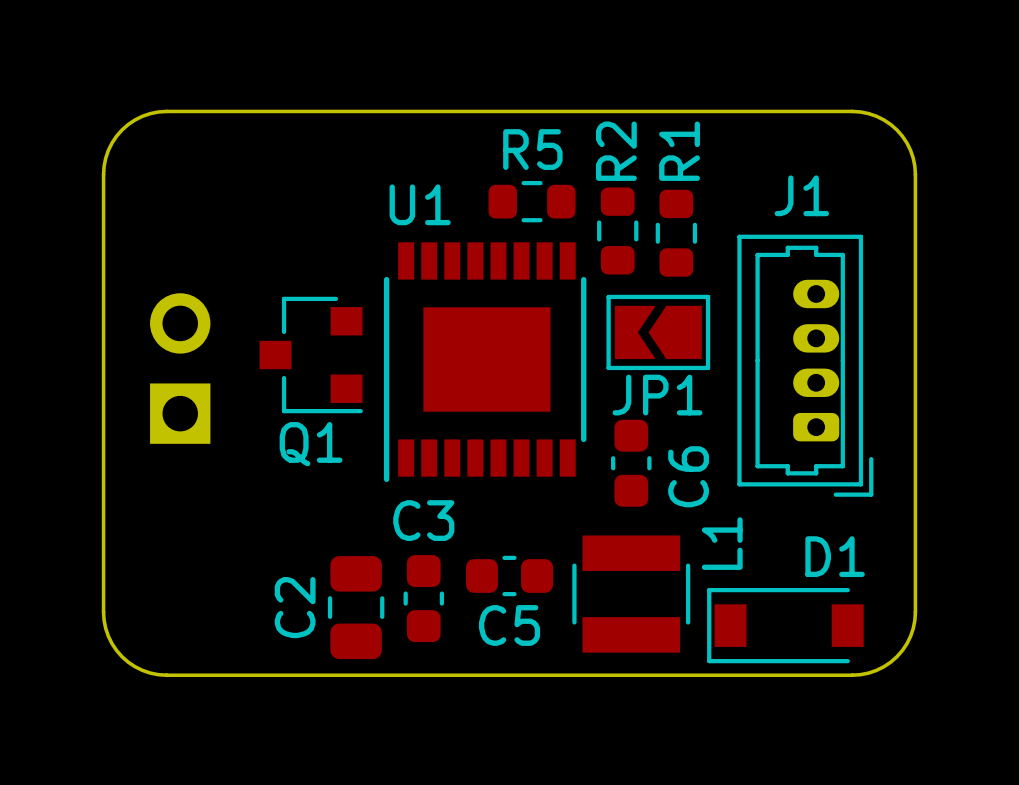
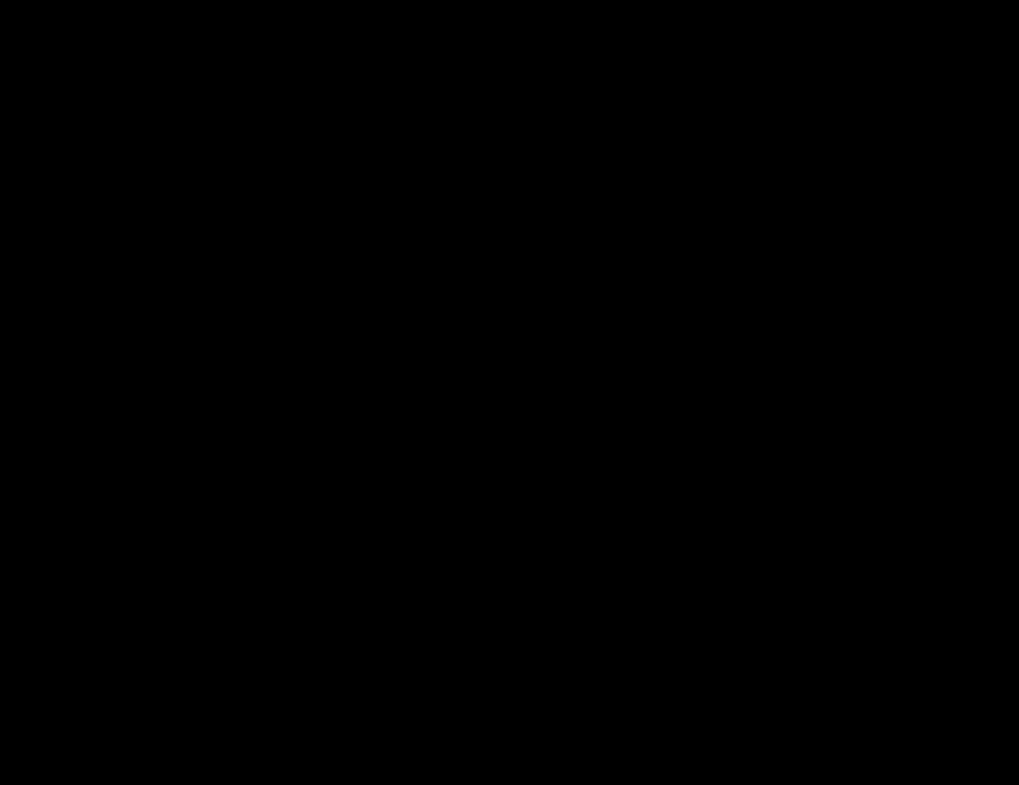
board edge: (852, 111) (158, 111) (135, 119) (122, 129) (108, 150) (103, 174) -> none
board edge: (852, 111) (876, 116) (896, 129) (910, 150) (915, 174) (914, 620) (906, 643) (896, 656) (876, 670) (860, 674) (166, 675) (150, 673) (135, 666) (122, 656) (112, 643) (105, 628) (103, 612) (103, 174) -> none
R5: (532, 201) -> none
R2: (617, 230) -> none
R1: (676, 233) -> none
JP1: (658, 332) -> none
Q1: (311, 355) -> none
U1: (485, 362) -> none
J1: (805, 365) -> none
part: (180, 368) -> none
C6: (631, 463) -> none
C5: (509, 576) -> none
L1: (631, 594) -> none
C3: (423, 598) -> none
C2: (356, 607) -> none
D1: (785, 625) -> none

